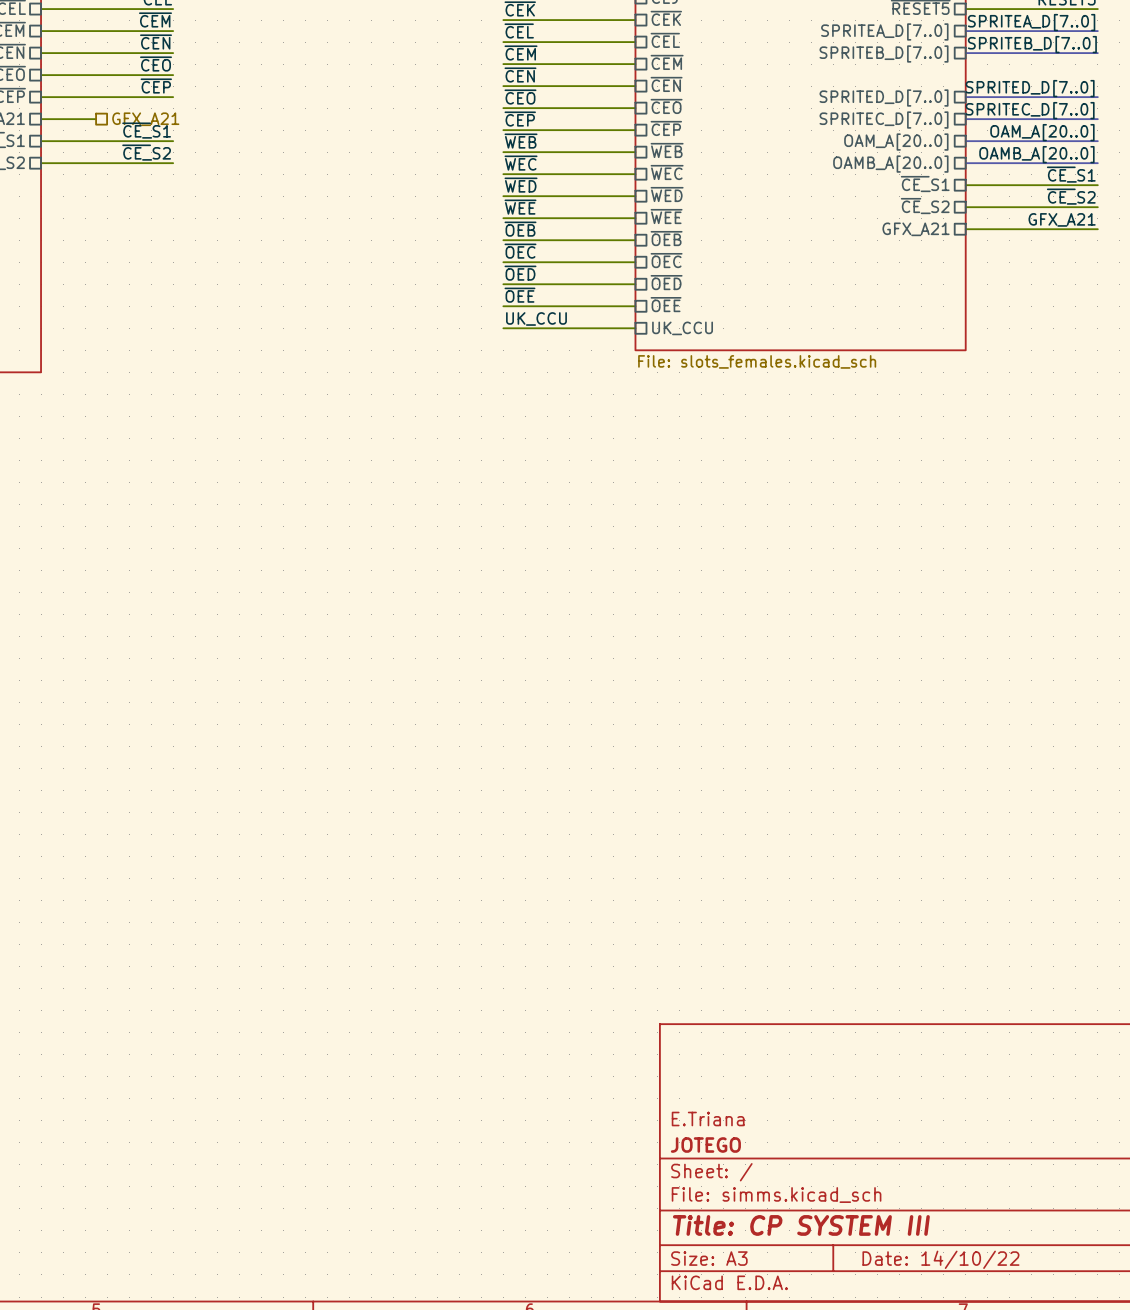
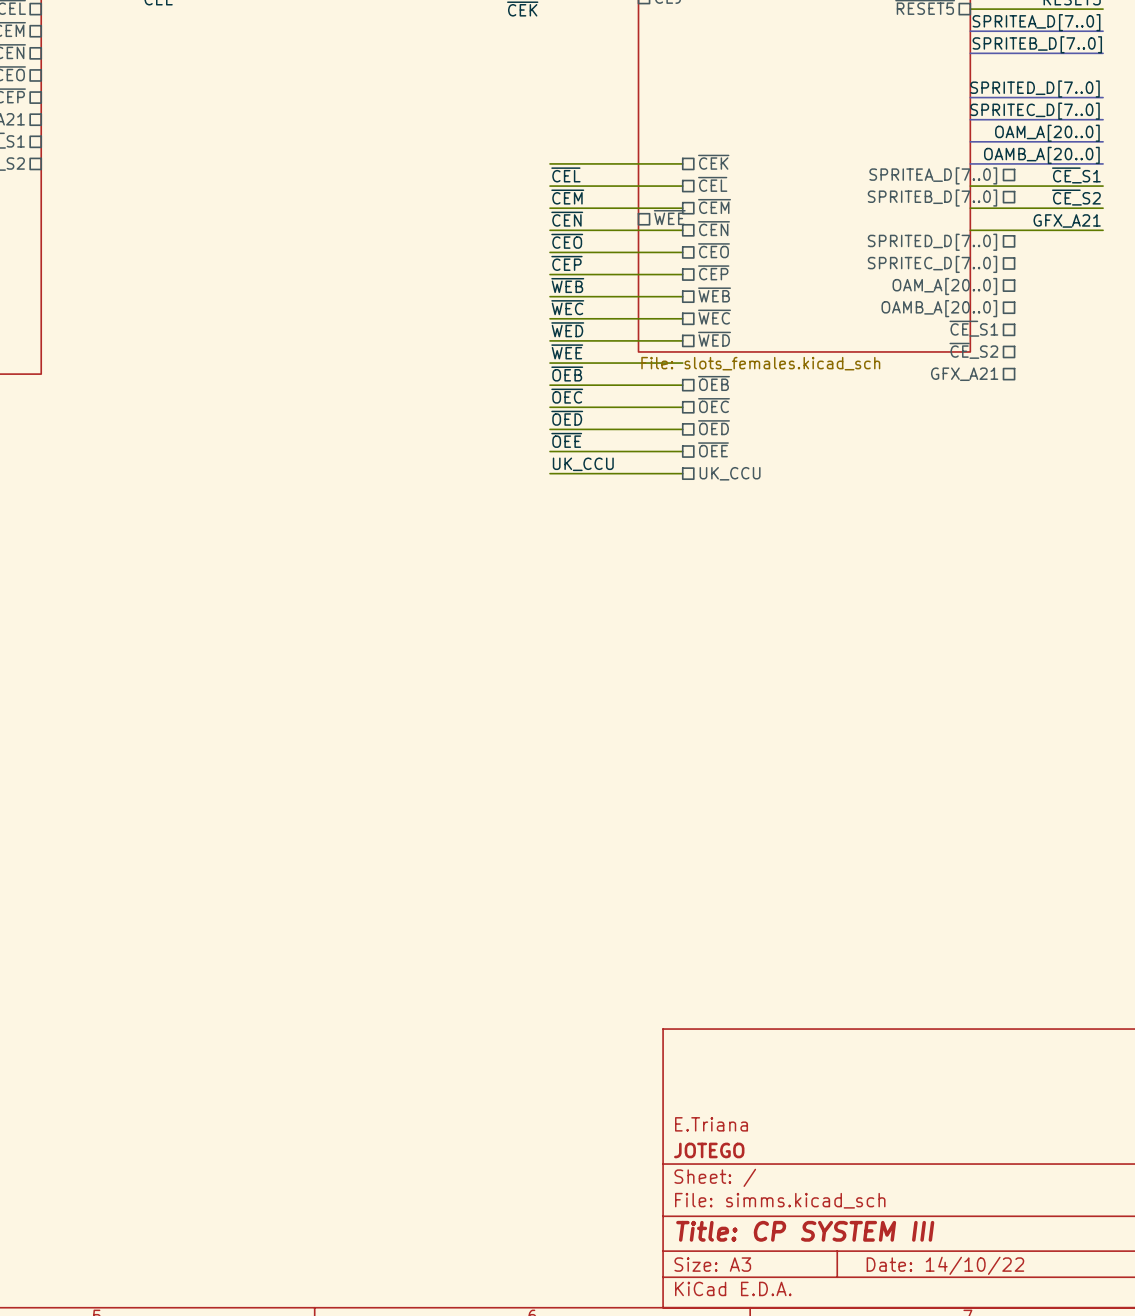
wire: (41, 9) (173, 9) -> none
sheet pin position: ~{CEK} (666, 18) -> ~{CEK} (713, 162)
label: ~{CEM} (155, 19) -> none
wire: (503, 20) (635, 20) -> (550, 163) (682, 163)
label position: ~{CEL} (519, 30) -> ~{CEL} (565, 174)
wire: (41, 31) (173, 31) -> none
sheet pin position: SPRITEA_D[7..0] (884, 31) -> SPRITEA_D[7..0] (933, 175)
sheet pin position: ~{CEL} (665, 40) -> ~{CEL} (712, 184)
label: ~{CEN} (156, 41) -> none
wire: (503, 42) (635, 42) -> (550, 186) (682, 186)
wire: (41, 53) (173, 53) -> none
label position: ~{CEM} (521, 53) -> ~{CEM} (567, 197)
sheet pin position: SPRITEB_D[7..0] (884, 53) -> SPRITEB_D[7..0] (932, 198)
sheet pin position: ~{CEM} (667, 62) -> ~{CEM} (714, 206)
label: ~{CEO} (156, 64) -> none
wire: (503, 64) (635, 64) -> (550, 208) (682, 208)
wire: (41, 75) (173, 75) -> none
label position: ~{CEN} (520, 75) -> ~{CEN} (567, 219)
sheet pin position: ~{CEN} (666, 84) -> ~{CEN} (713, 228)
label: ~{CEP} (156, 86) -> none
wire: (503, 86) (635, 86) -> (550, 230) (682, 230)
wire: (41, 97) (173, 97) -> none
label position: ~{CEO} (520, 97) -> ~{CEO} (567, 241)
sheet pin position: SPRITED_D[7..0] (884, 98) -> SPRITED_D[7..0] (932, 242)
sheet pin position: ~{CEO} (666, 106) -> ~{CEO} (713, 250)
wire: (503, 108) (635, 108) -> (550, 252) (682, 252)
wire: (41, 119) (96, 119) -> none
hierarchical label: GFX_A21 (145, 119) -> none
label position: ~{CEP} (520, 119) -> ~{CEP} (566, 263)
sheet pin position: SPRITEC_D[7..0] (884, 120) -> SPRITEC_D[7..0] (932, 264)
sheet pin position: ~{CEP} (666, 128) -> ~{CEP} (713, 272)
label: ~{CE_}S1 (146, 130) -> none
wire: (503, 130) (635, 130) -> (550, 274) (682, 274)
wire: (41, 141) (173, 141) -> none
label position: ~{WEB} (521, 141) -> ~{WEB} (567, 285)
sheet pin position: OAM_A[20..0] (896, 142) -> OAM_A[20..0] (944, 286)
sheet pin position: ~{WEB} (667, 150) -> ~{WEB} (714, 294)
label: ~{CE_}S2 (146, 152) -> none
wire: (503, 152) (635, 152) -> (550, 296) (682, 296)
wire: (41, 163) (173, 163) -> none
label position: ~{WEC} (521, 163) -> ~{WEC} (567, 307)
sheet pin position: OAMB_A[20..0] (890, 164) -> OAMB_A[20..0] (939, 308)
sheet pin position: ~{WEC} (667, 172) -> ~{WEC} (714, 317)
wire: (503, 174) (635, 174) -> (550, 318) (682, 318)
sheet pin position: ~{CE_}S1 (925, 184) -> ~{CE_}S1 (973, 328)
label position: ~{WED} (521, 185) -> ~{WED} (567, 329)
sheet pin position: ~{WED} (667, 194) -> ~{WED} (714, 339)
wire: (503, 196) (635, 196) -> (550, 340) (682, 340)
sheet pin position: ~{CE}_S2 (925, 206) -> ~{CE}_S2 (973, 350)
label position: ~{WEE} (520, 207) -> ~{WEE} (567, 351)
wire: (503, 218) (635, 218) -> (550, 363) (682, 363)
label position: ~{OEB} (520, 229) -> ~{OEB} (567, 374)
sheet pin position: GFX_A21 (916, 229) -> GFX_A21 (964, 374)
sheet pin position: ~{OEB} (666, 238) -> ~{OEB} (713, 383)
wire: (503, 240) (635, 240) -> (550, 385) (682, 385)
label position: ~{OEC} (520, 251) -> ~{OEC} (567, 396)
sheet pin position: ~{OEC} (666, 260) -> ~{OEC} (713, 405)
wire: (503, 262) (635, 262) -> (550, 407) (682, 407)
label position: ~{OED} (520, 273) -> ~{OED} (567, 418)
sheet pin position: ~{OED} (666, 282) -> ~{OED} (713, 427)
wire: (503, 284) (635, 284) -> (550, 429) (682, 429)
label position: ~{OEE} (519, 295) -> ~{OEE} (566, 440)
sheet pin position: ~{OEE} (666, 304) -> ~{OEE} (713, 449)
wire: (503, 306) (635, 306) -> (550, 451) (682, 451)
label position: UK_CCU (536, 318) -> UK_CCU (583, 464)
wire: (503, 328) (635, 328) -> (550, 473) (682, 473)
sheet pin position: UK_CCU (682, 328) -> UK_CCU (730, 473)

